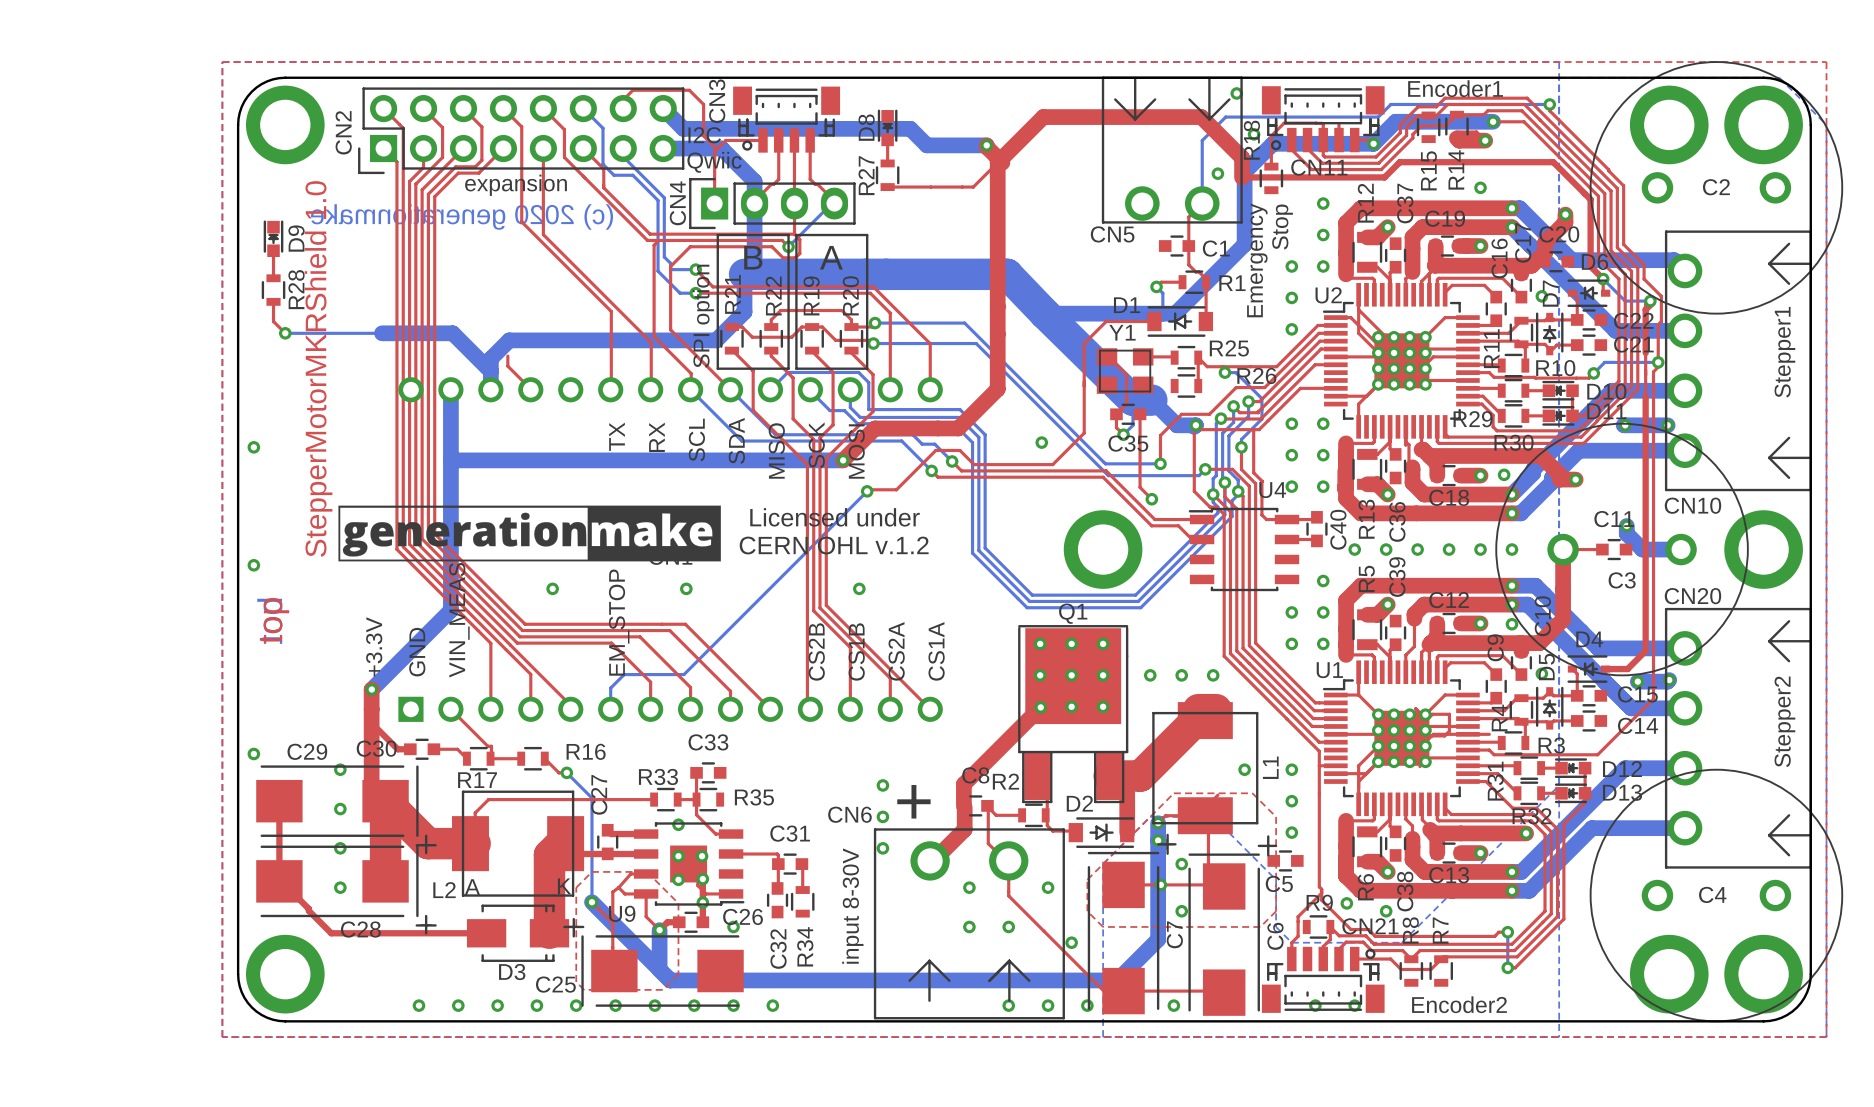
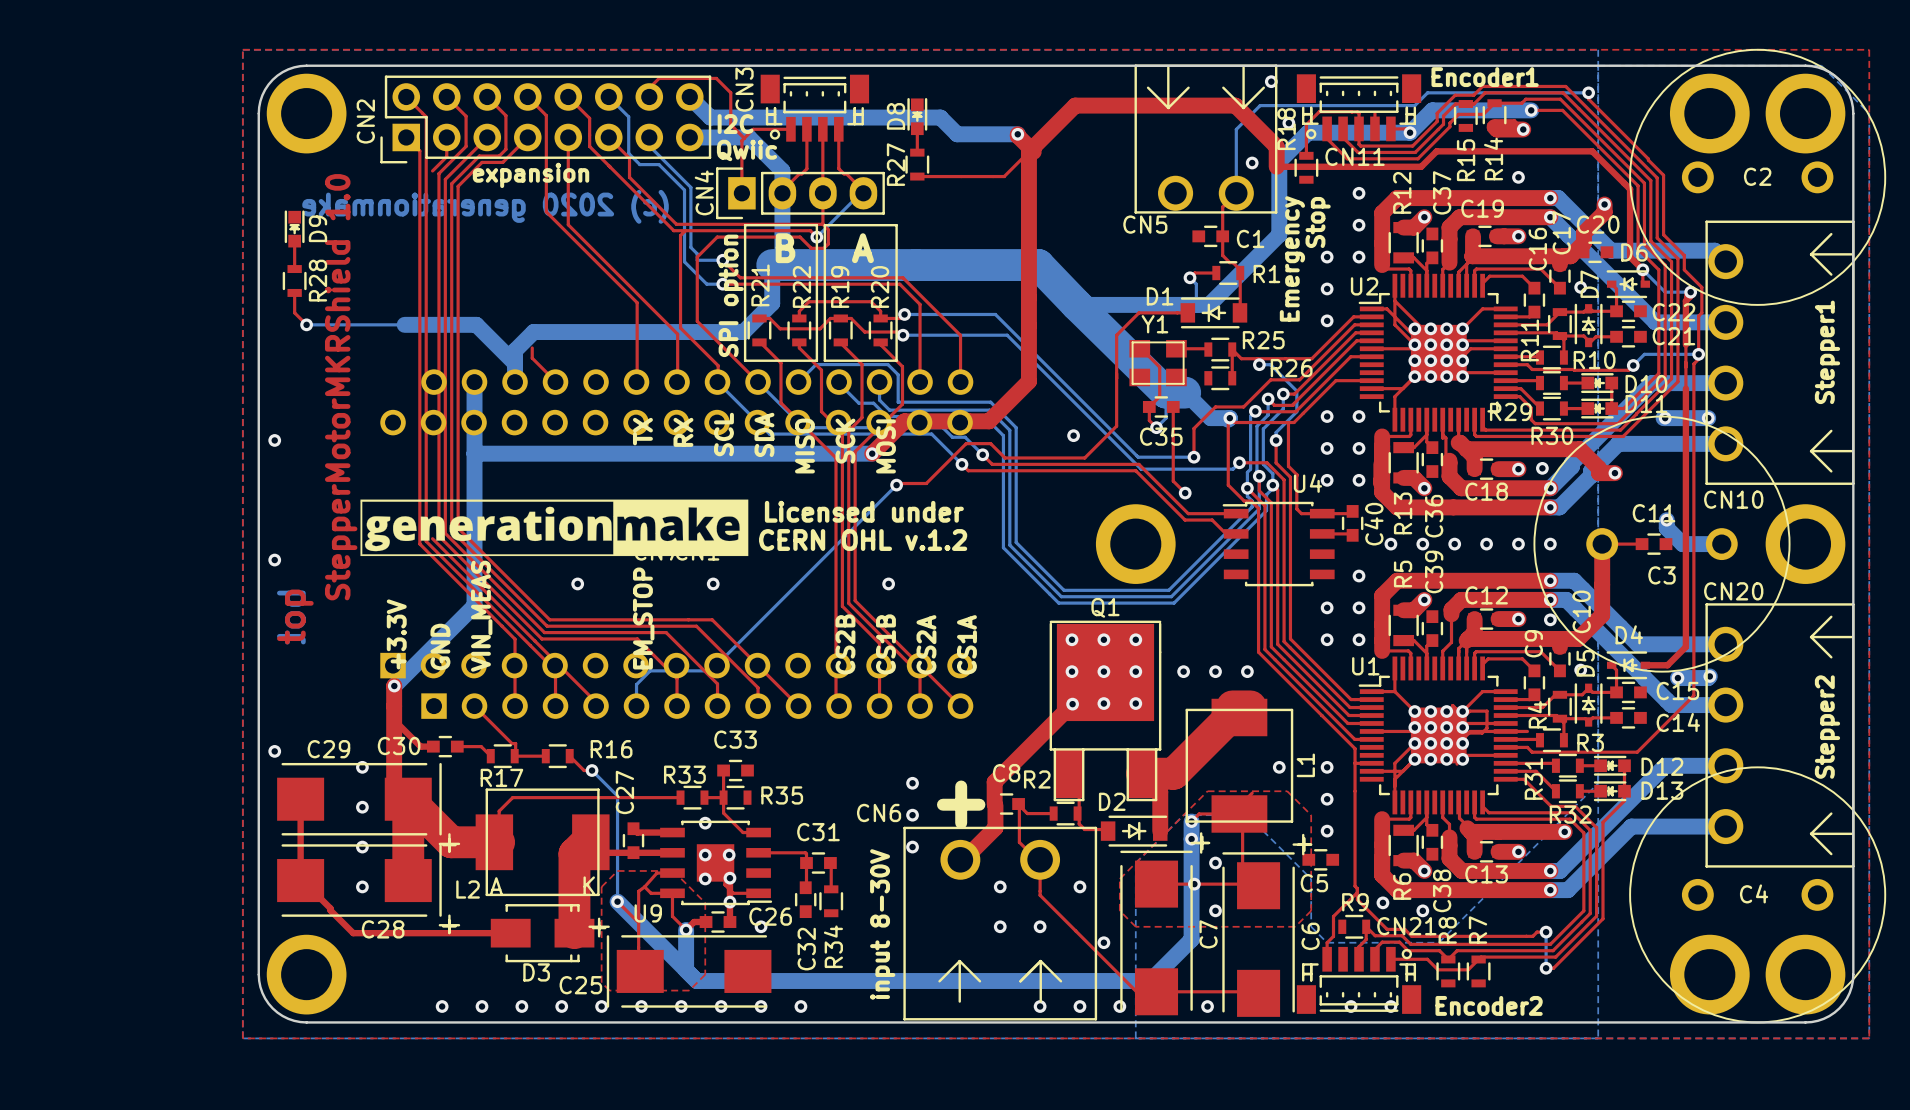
top track: (409, 181) (409, 544) -> none
part: none -> (676, 544)

